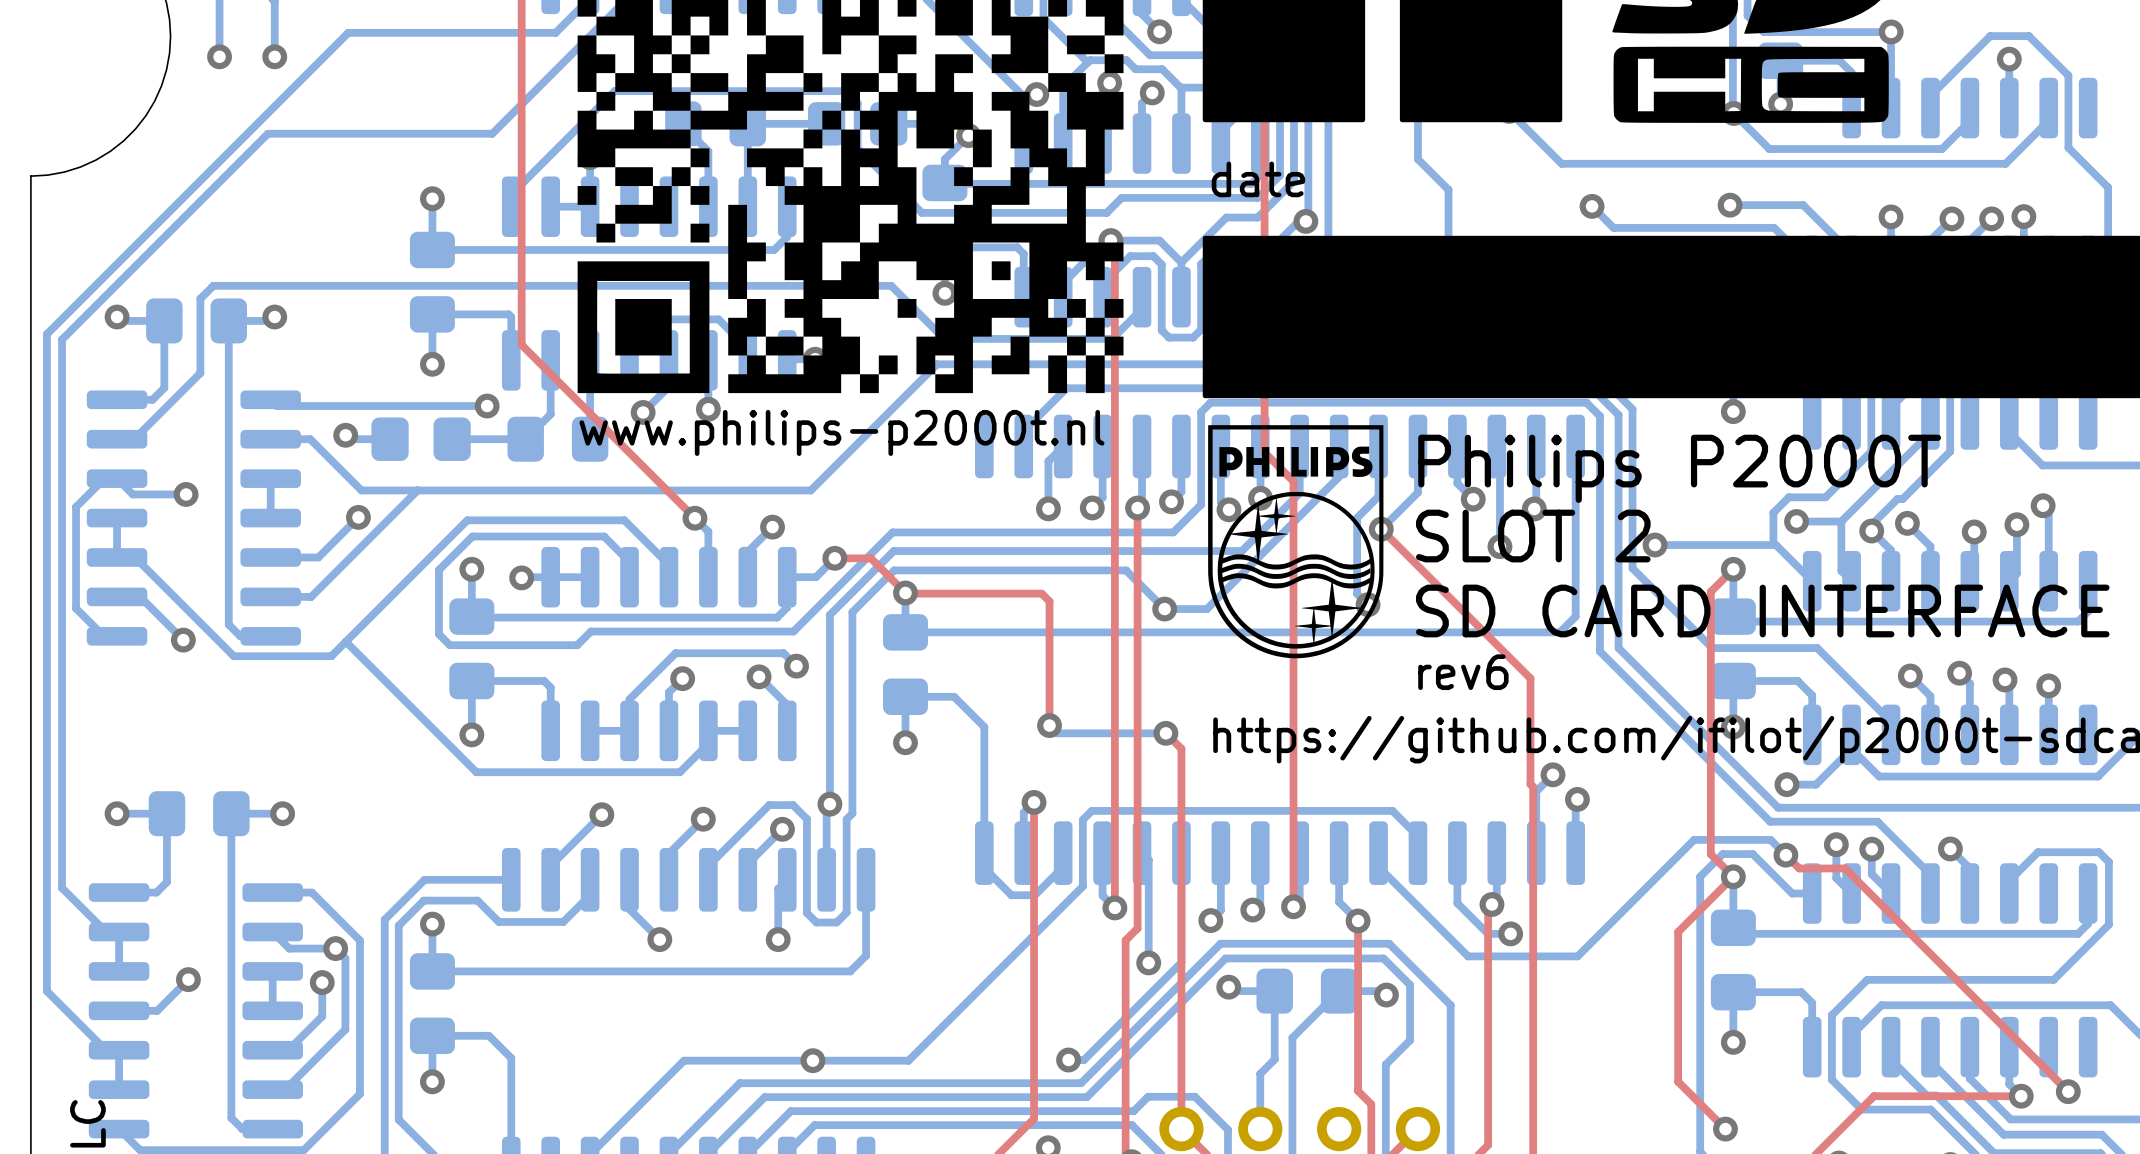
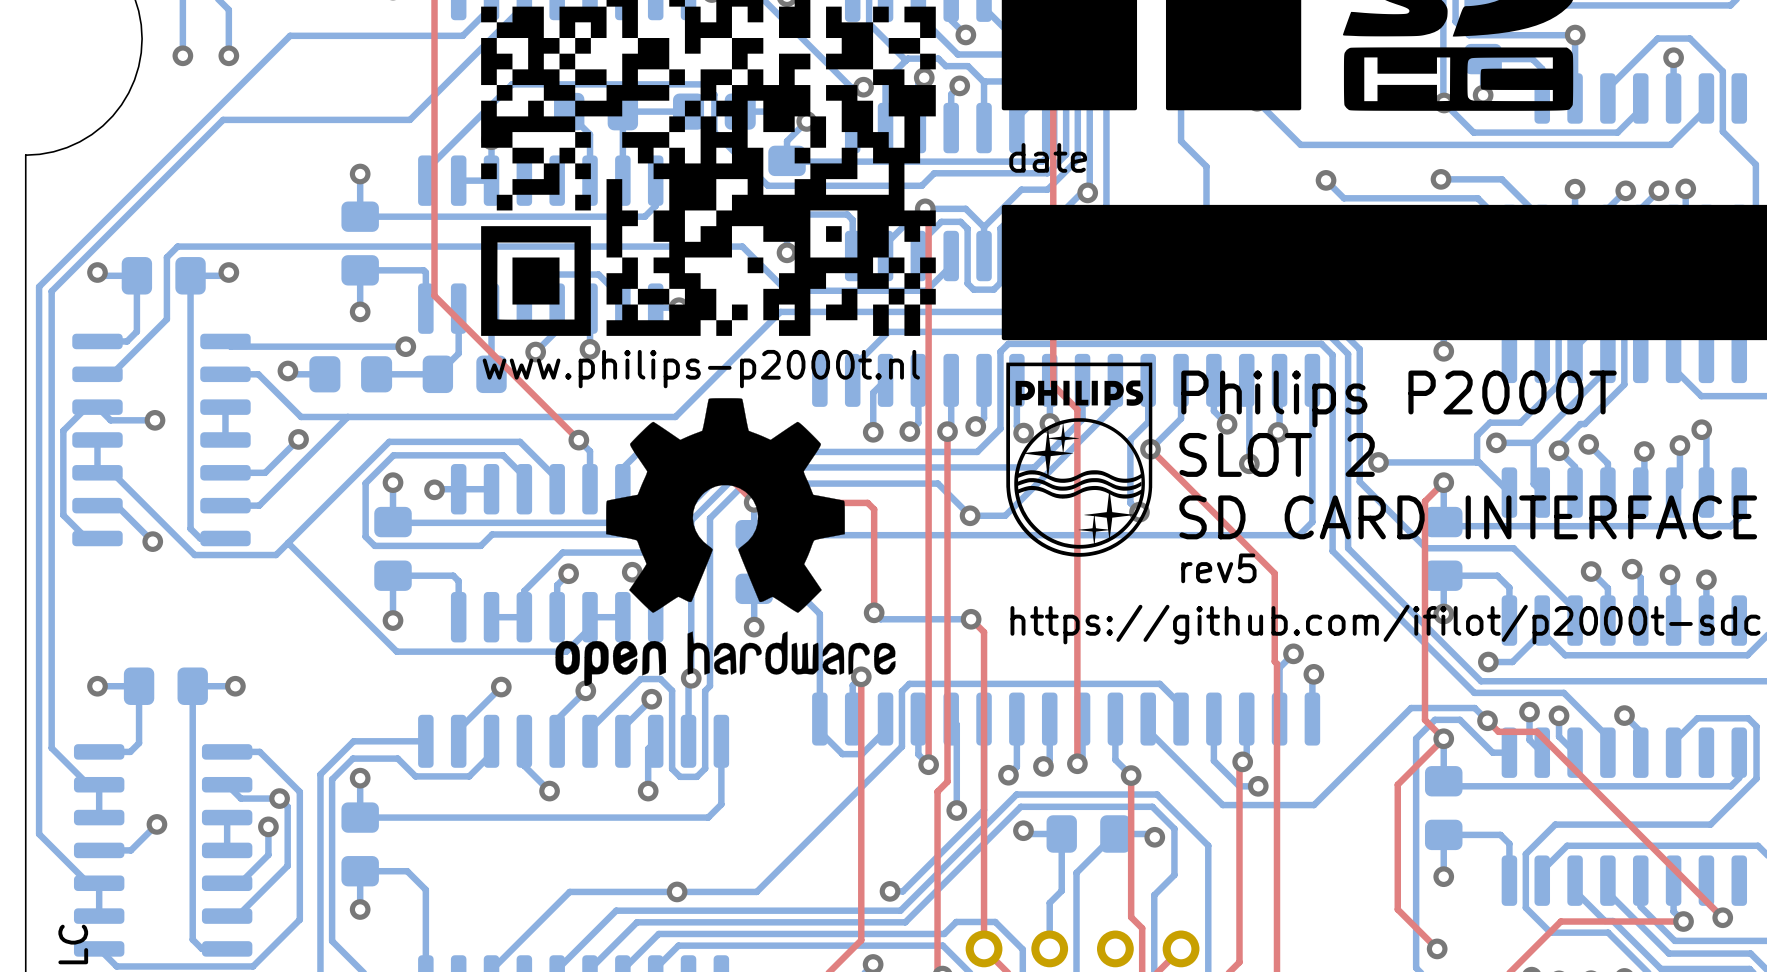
drawing: none -> [555, 398, 896, 686]
text: rev6 (1463, 672) -> rev5 (1218, 568)

